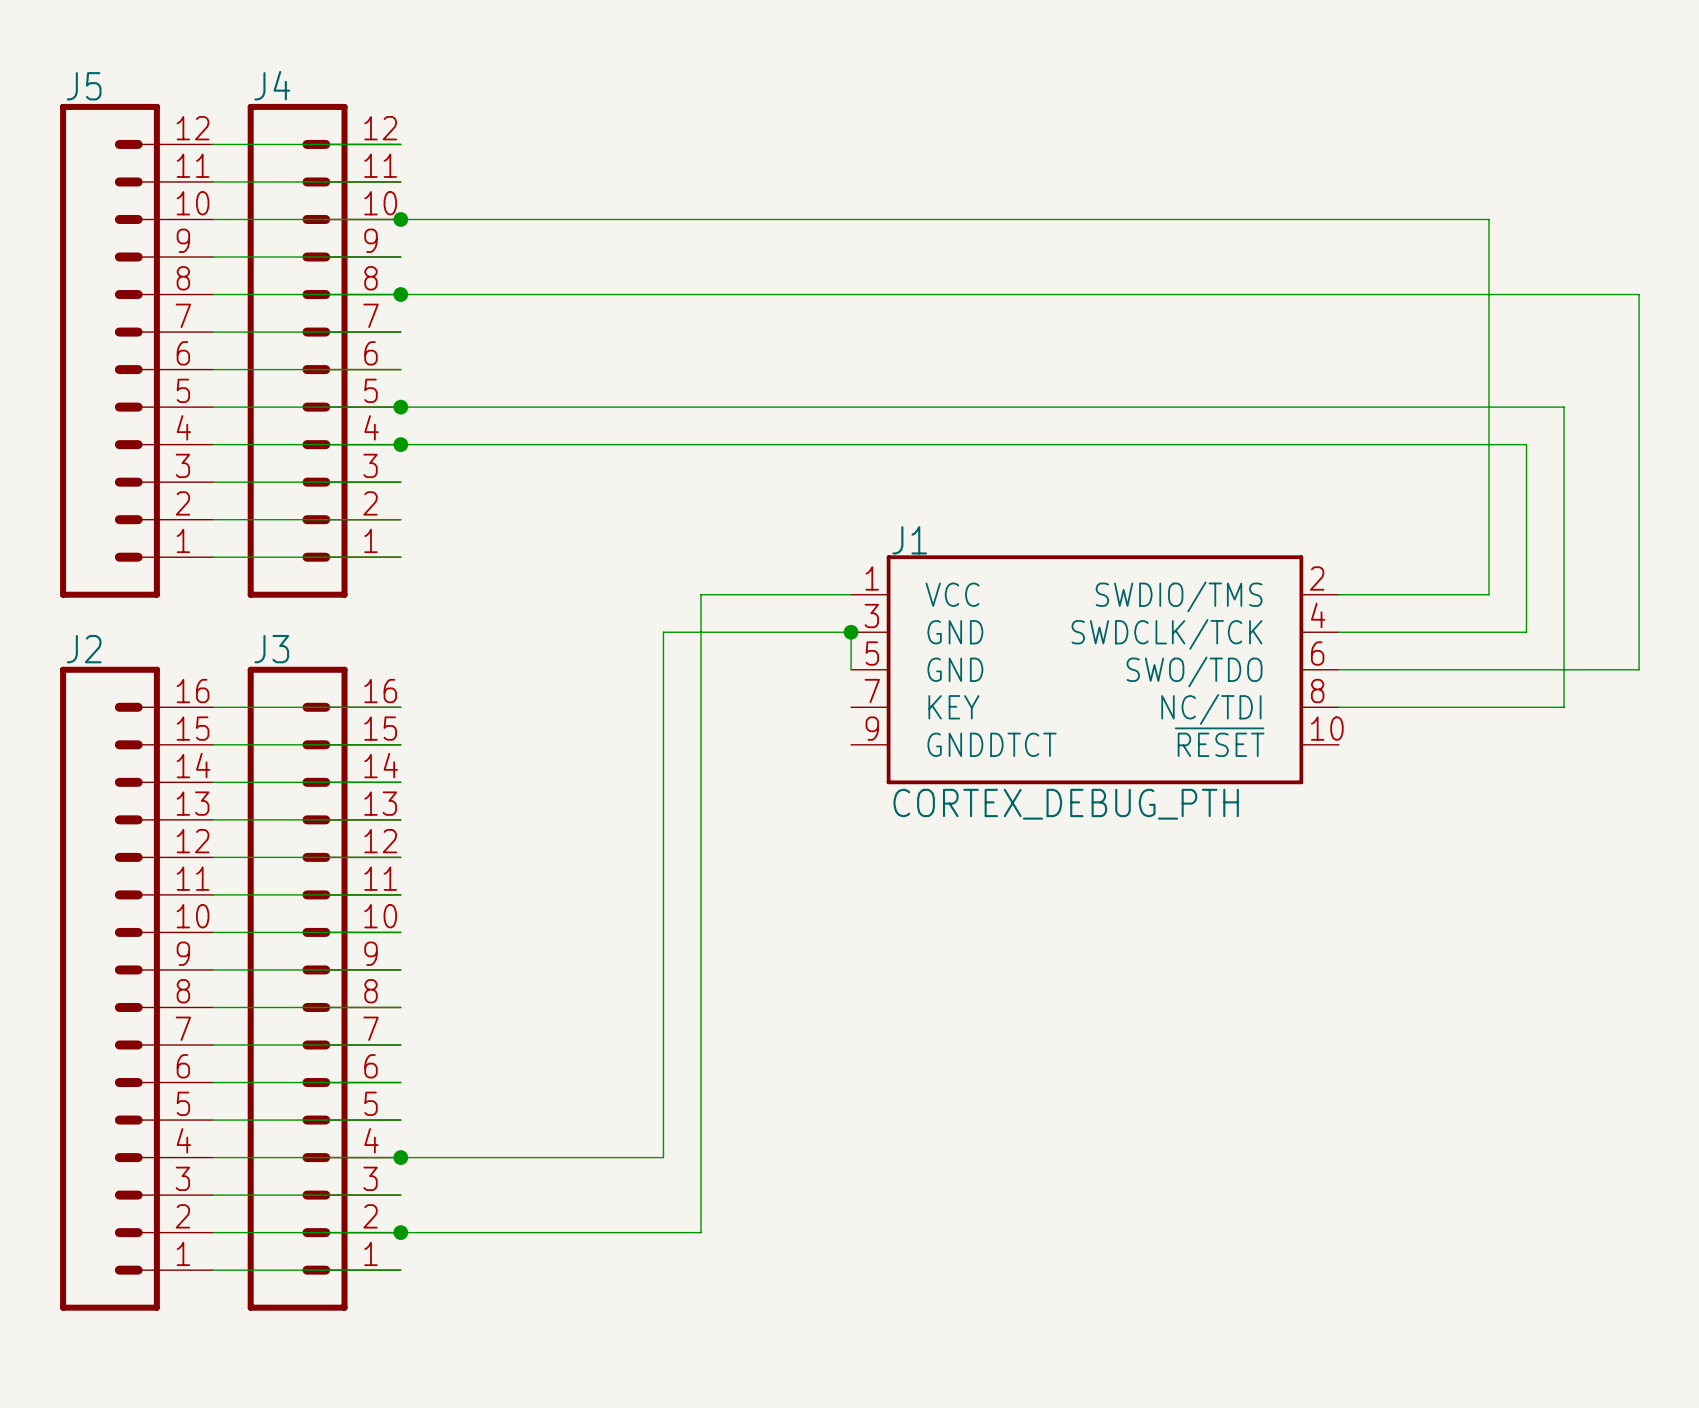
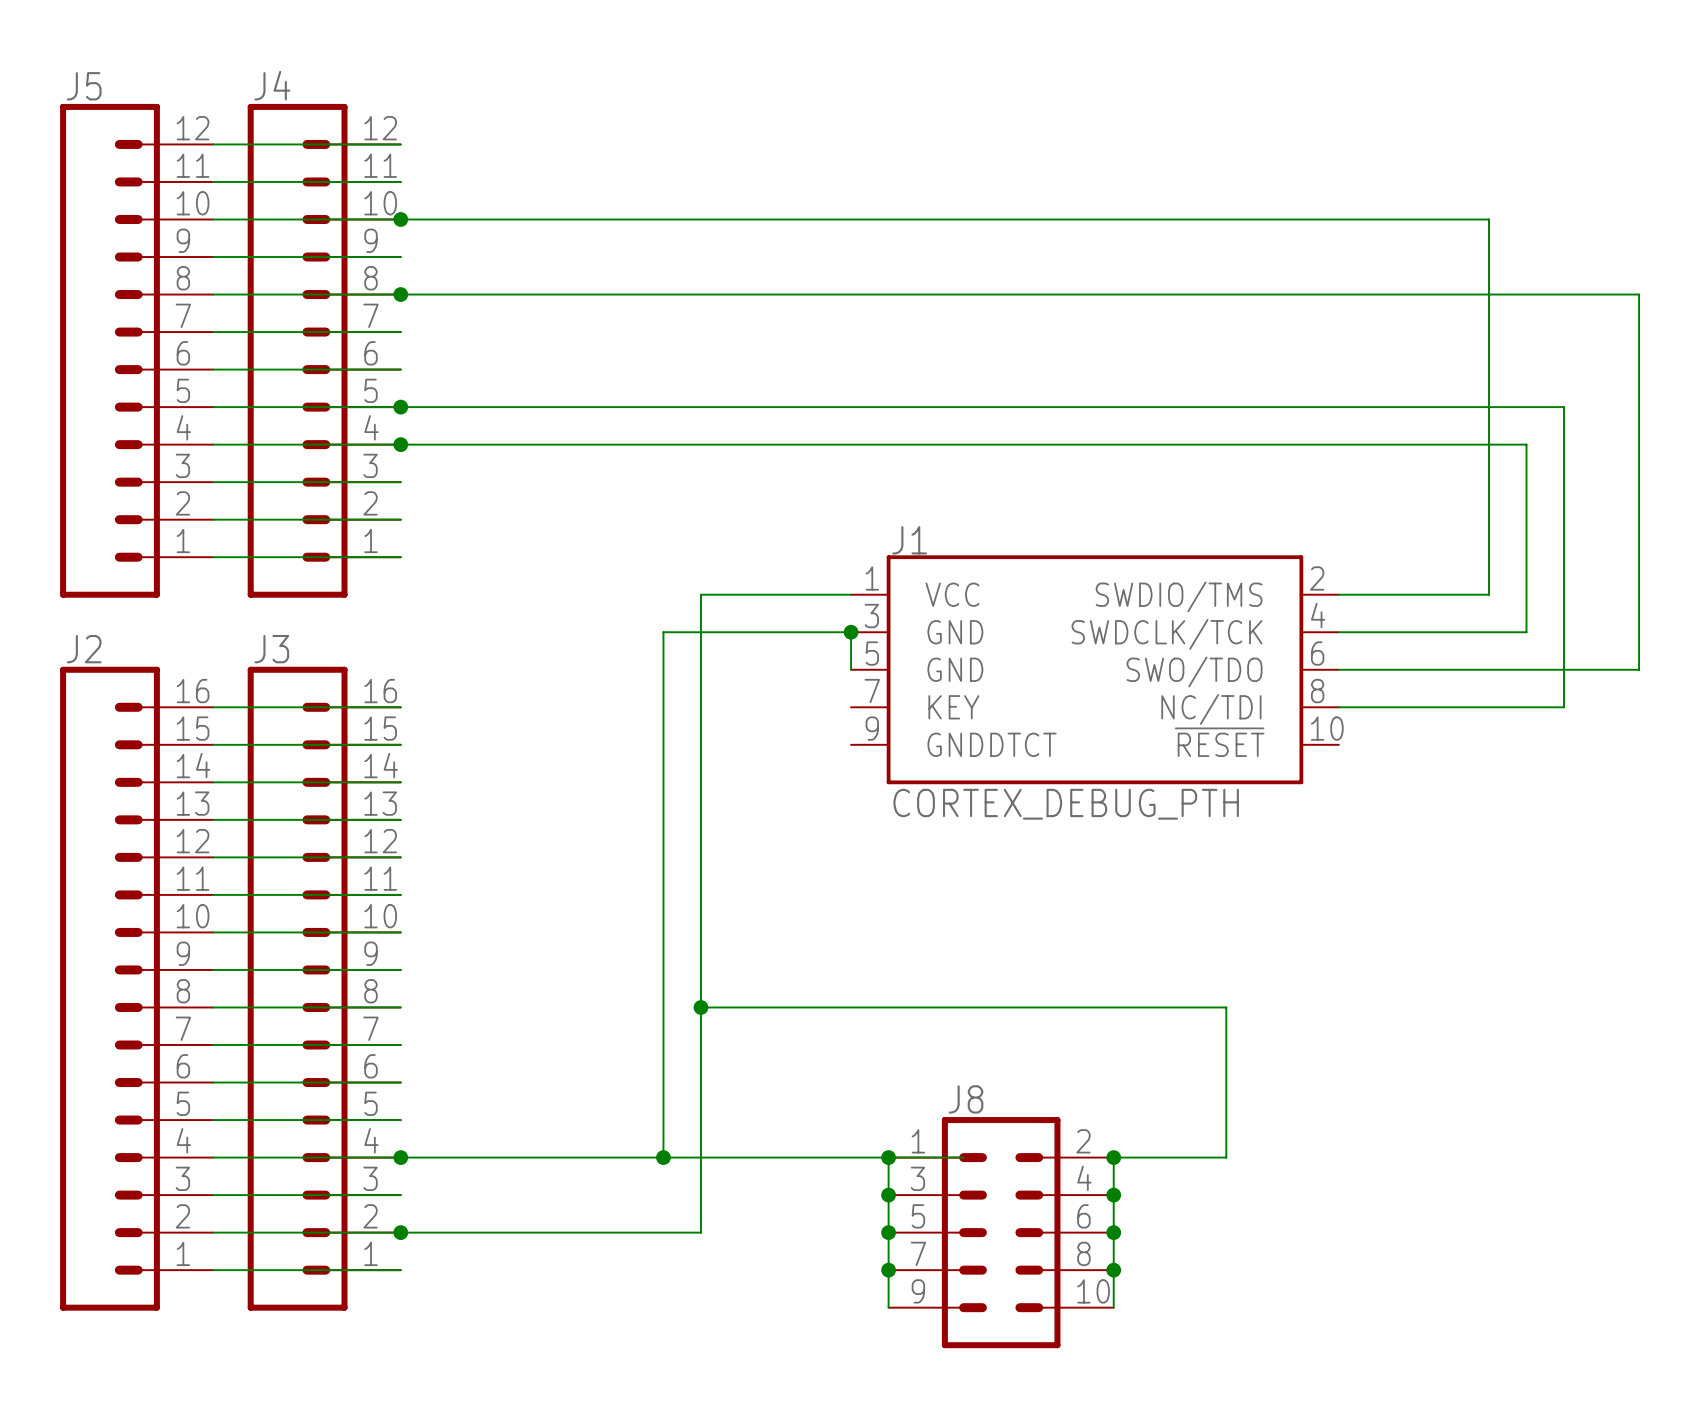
wire: none -> (700, 1007) (1226, 1007) (1226, 1157) (1113, 1157) (1113, 1307)
junction: none -> (700, 1007)
wire: none -> (663, 1157) (963, 1157)
junction: none -> (663, 1157)
wire: none -> (888, 1157) (888, 1307)
junction: none -> (888, 1157)
junction: none -> (1113, 1157)
junction: none -> (888, 1195)
junction: none -> (1113, 1195)
junction: none -> (888, 1232)
J8: none -> (1001, 1232)
junction: none -> (1113, 1232)
junction: none -> (888, 1270)
junction: none -> (1113, 1270)

